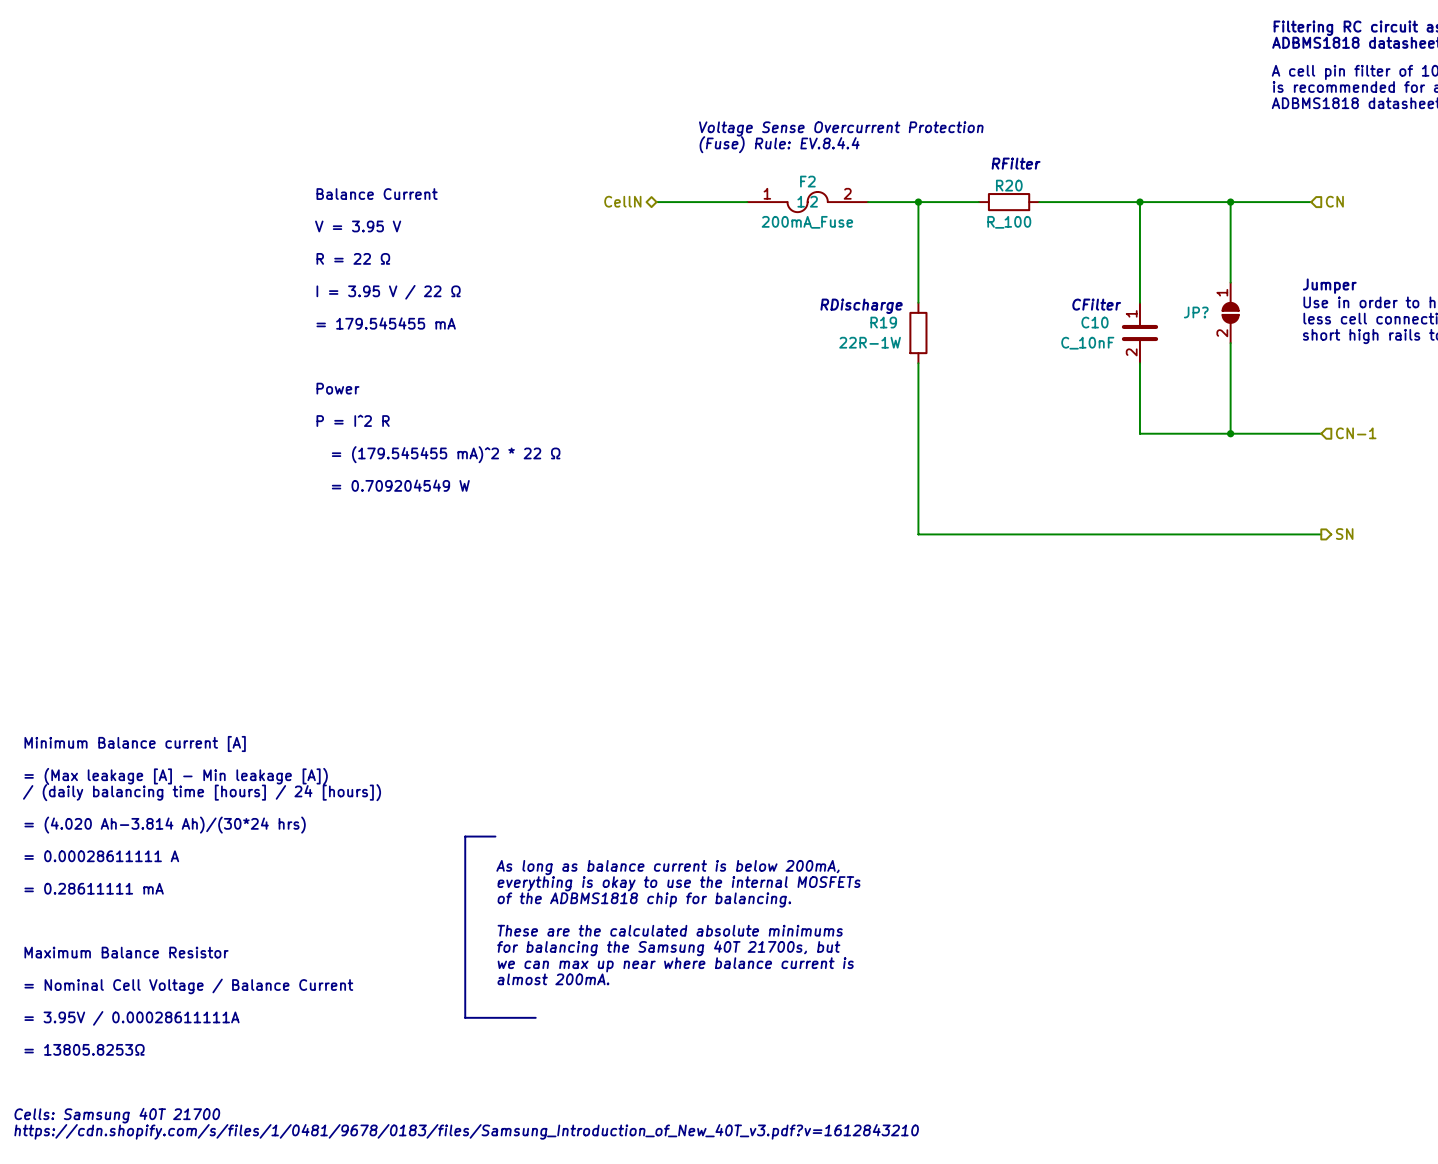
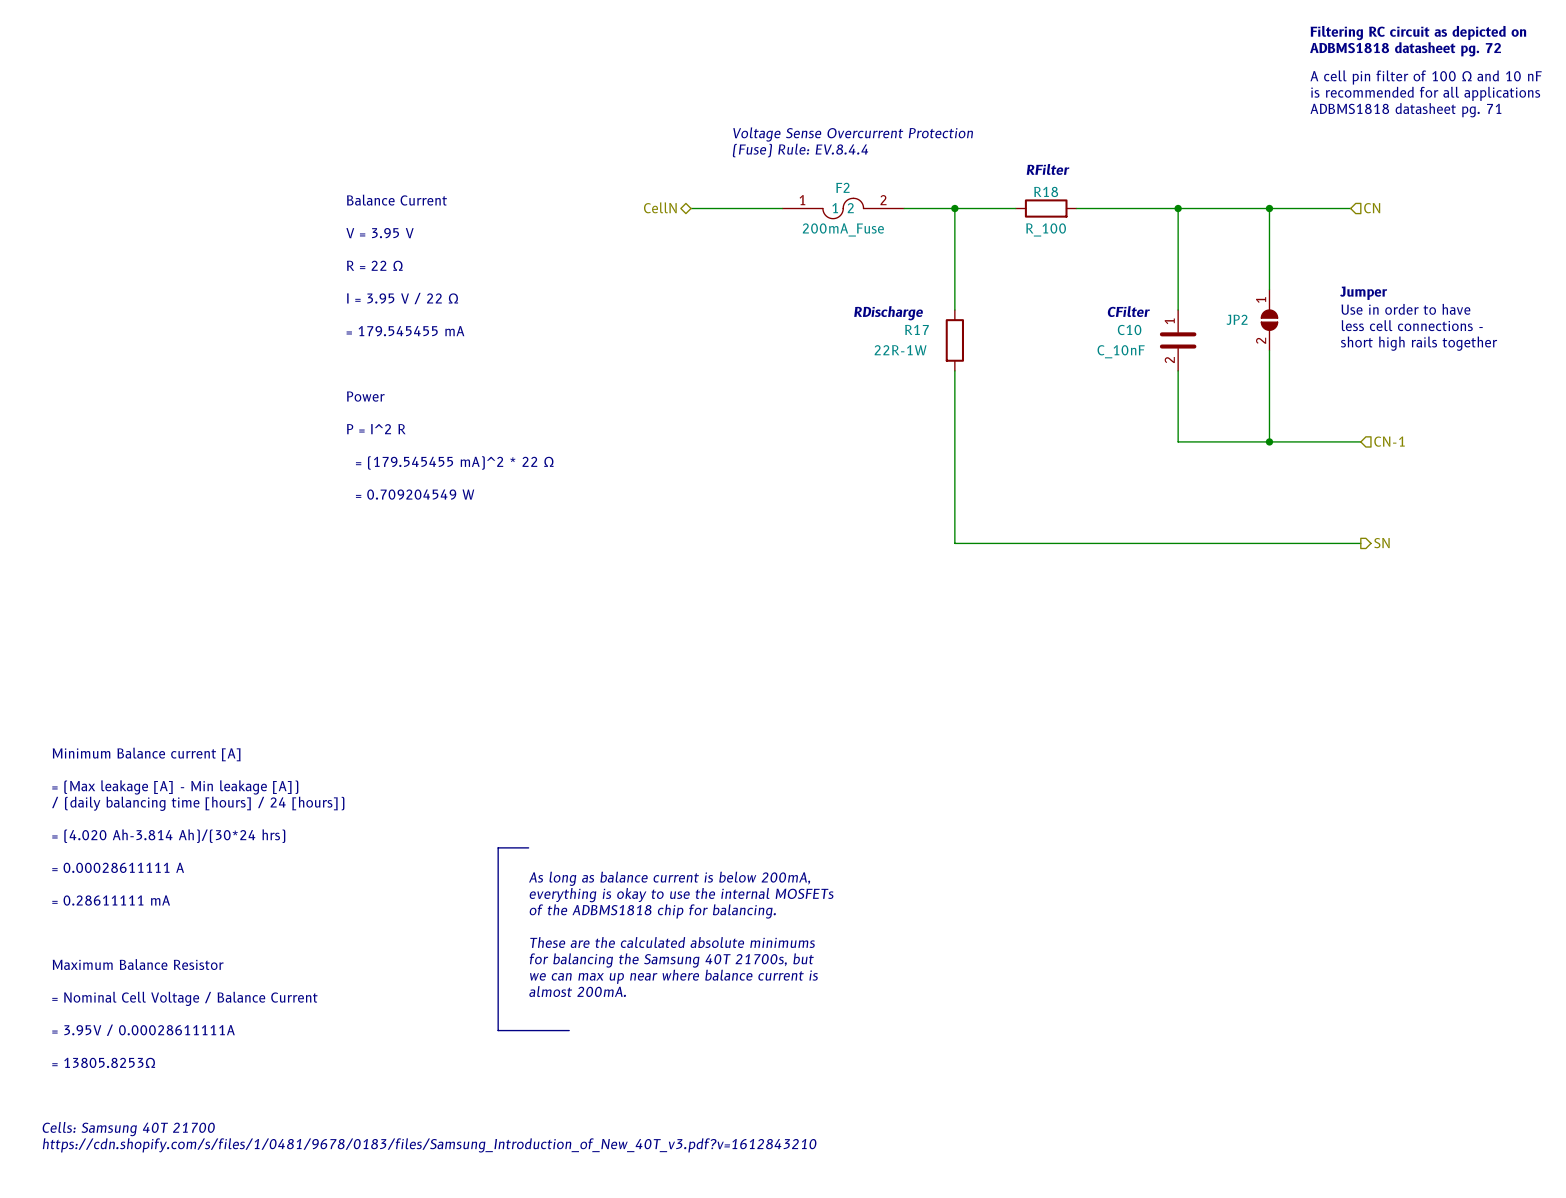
R20 name: R20 (1009, 185) -> R18 (1046, 191)
JP? name: JP? (1196, 312) -> JP2 (1237, 319)
R19 name: R19 (883, 322) -> R17 (916, 329)

